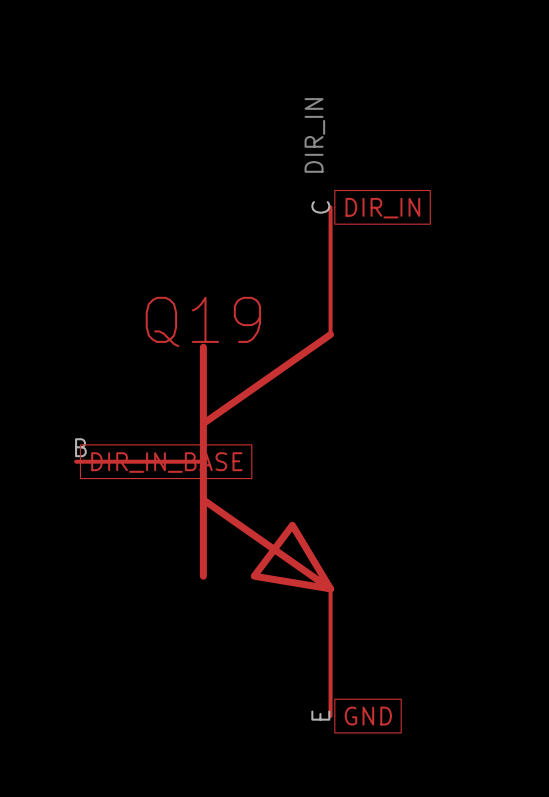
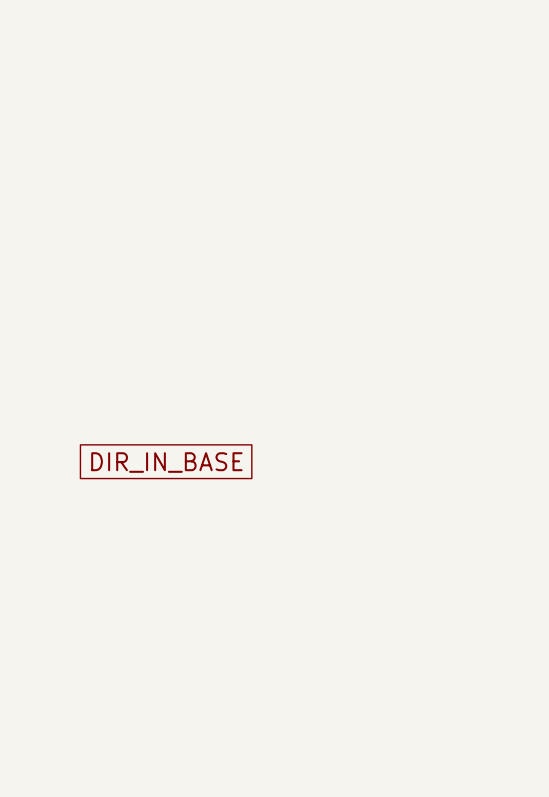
text: DIR_IN (314, 135) -> none
global label: DIR_IN (382, 208) -> none
part: (204, 461) -> none
global label: GND (368, 716) -> none

